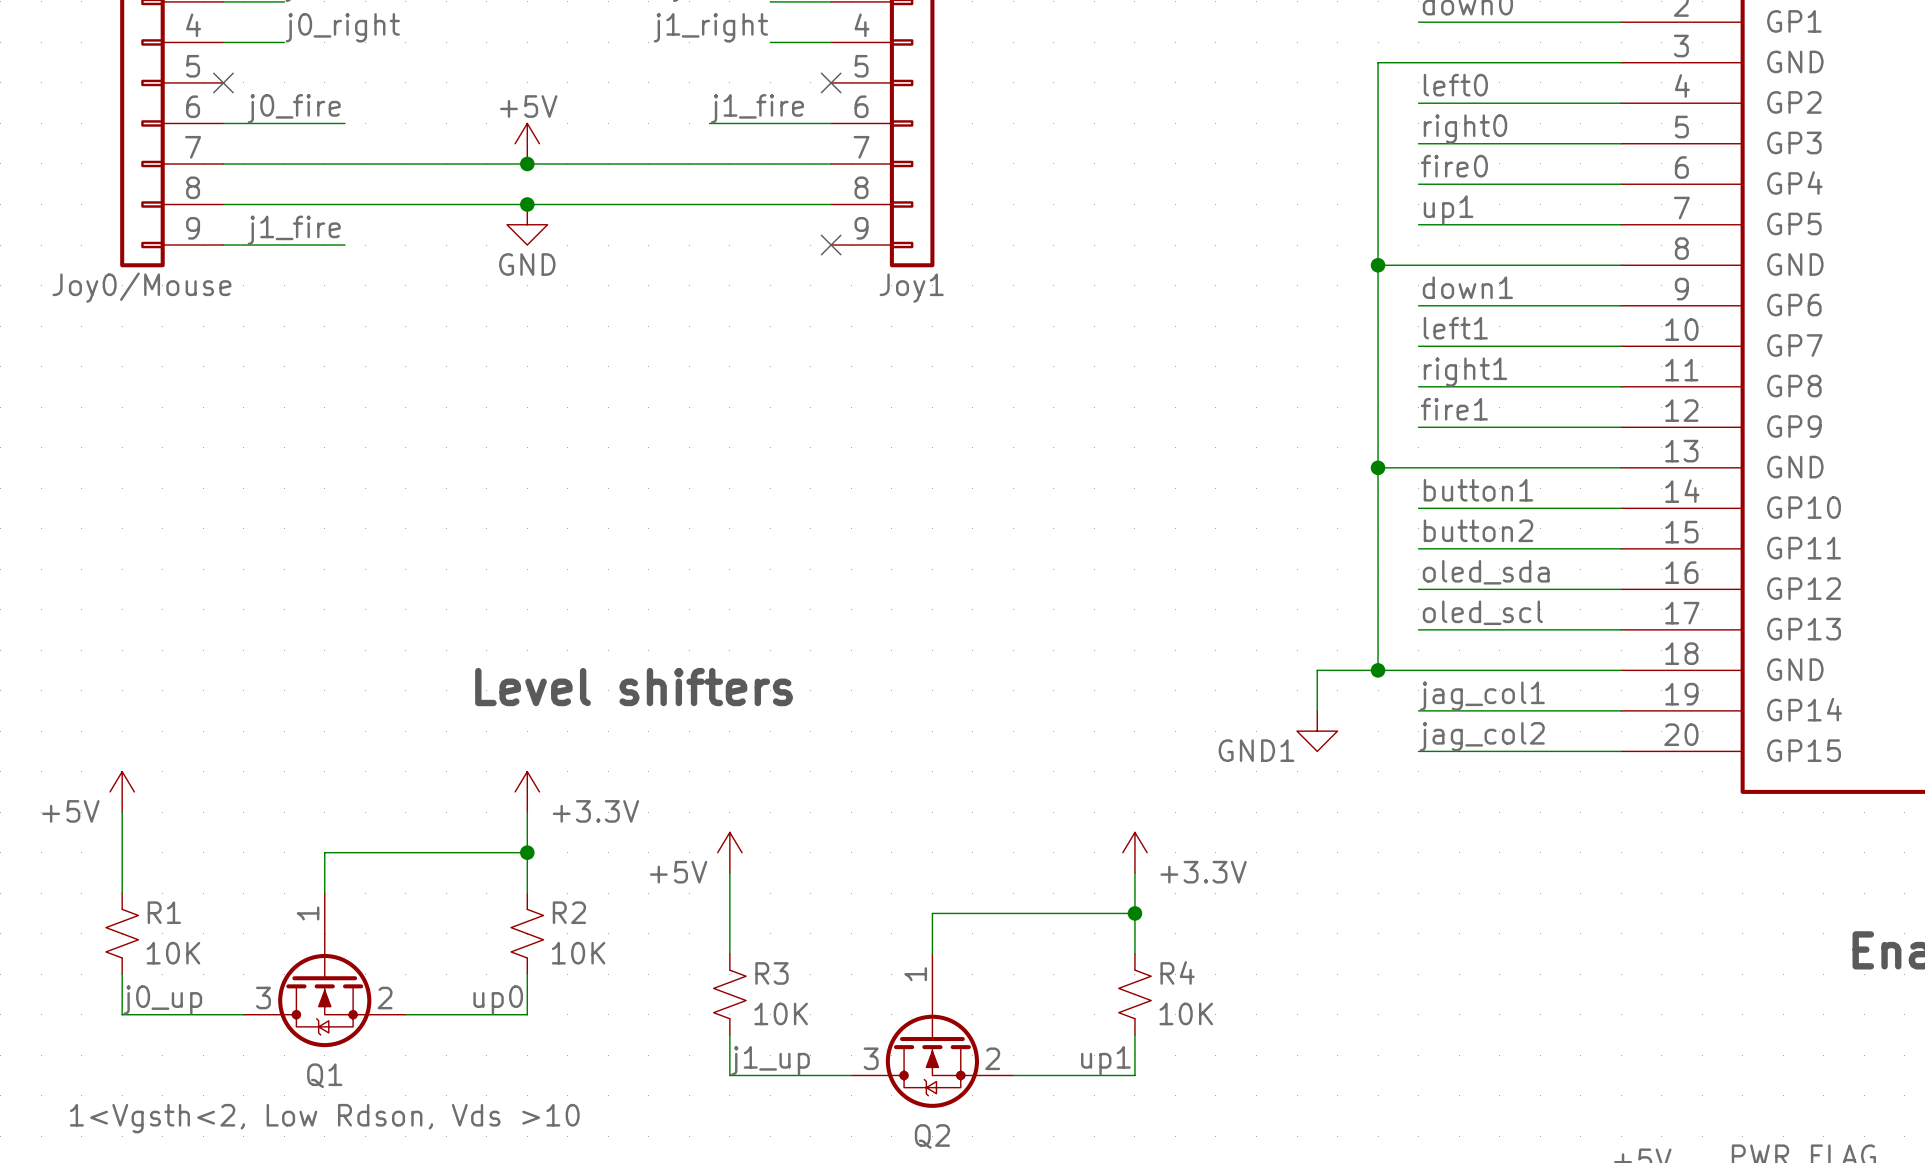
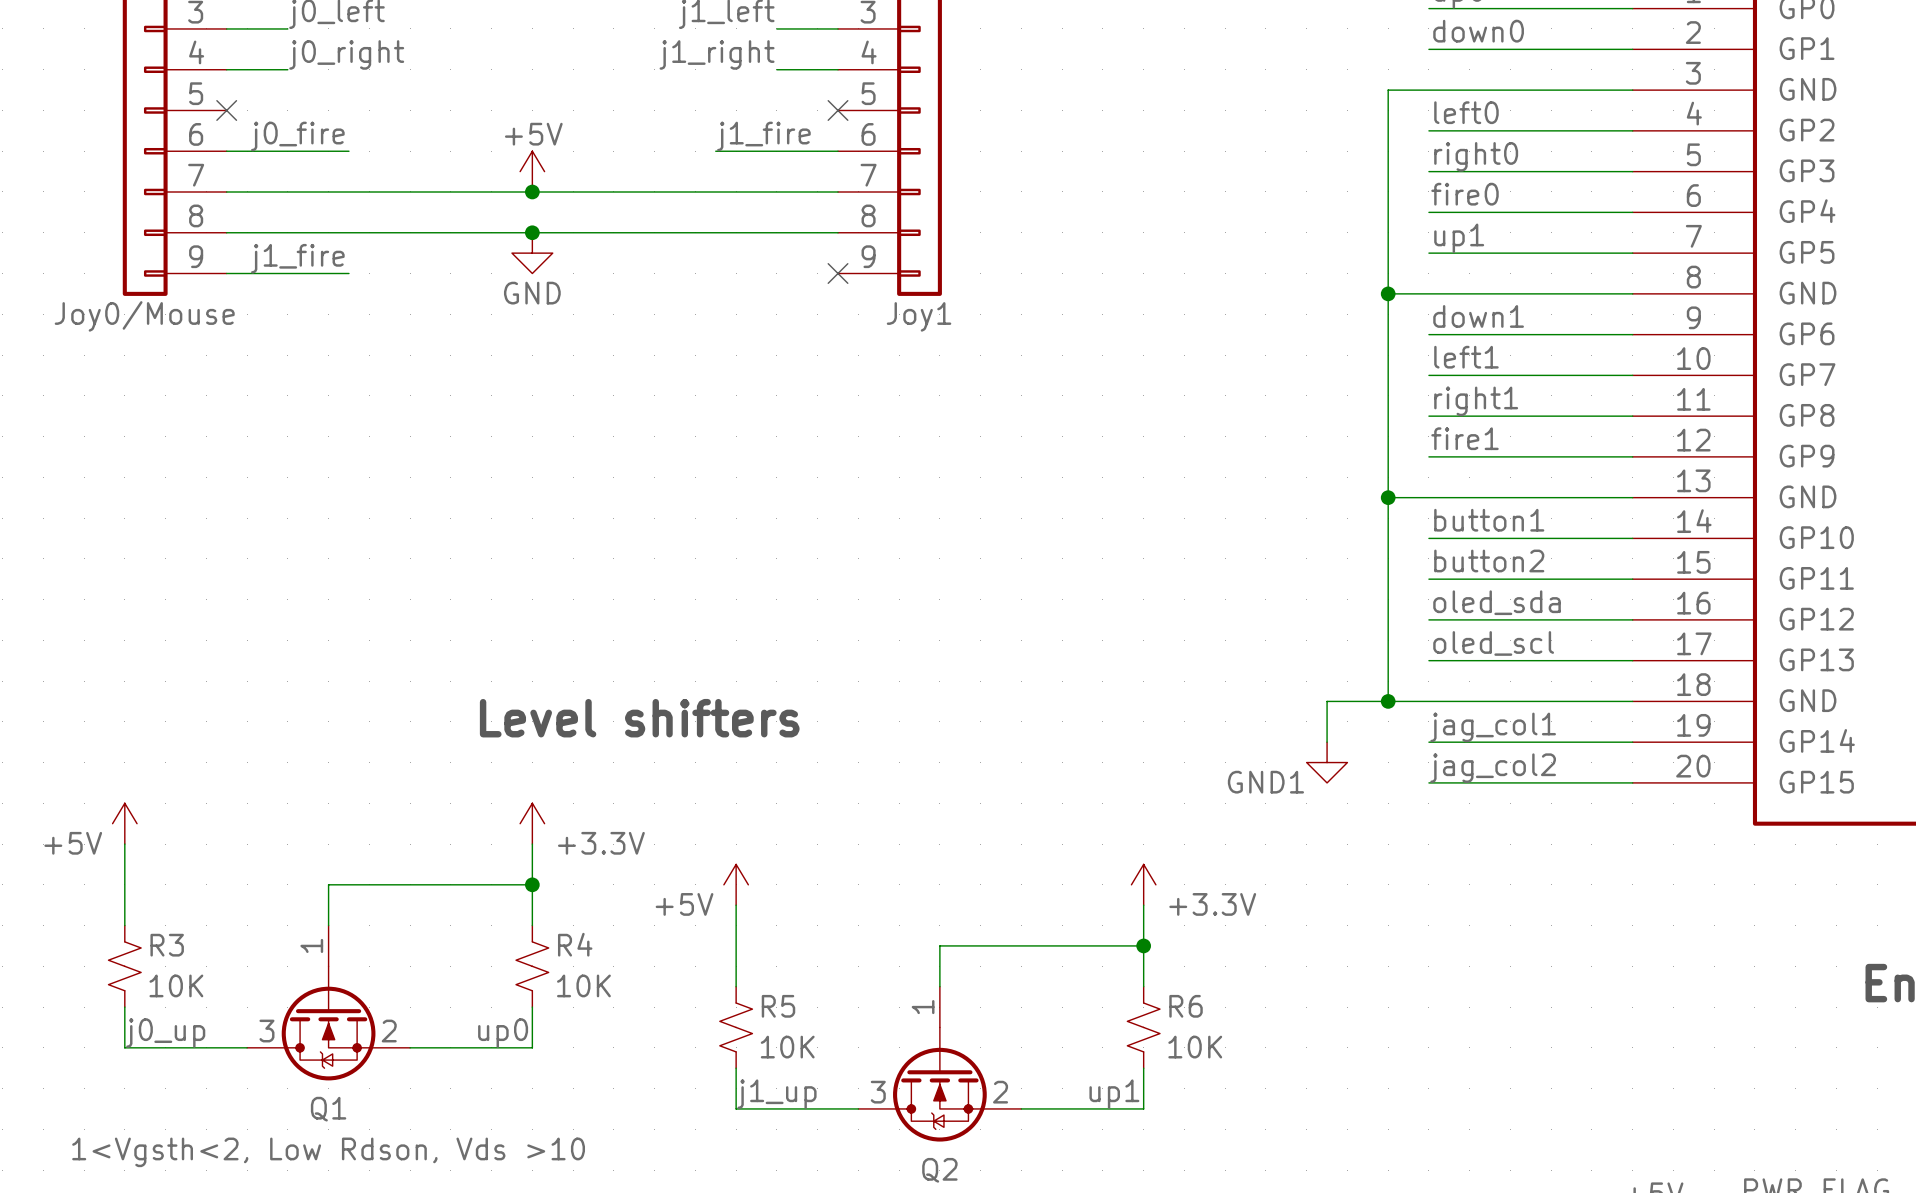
R1 name: R1 (164, 912) -> R3 (167, 945)
R2 name: R2 (569, 912) -> R4 (575, 944)
R4 name: R4 (1177, 972) -> R6 (1186, 1006)
R3 name: R3 (771, 973) -> R5 (778, 1006)

